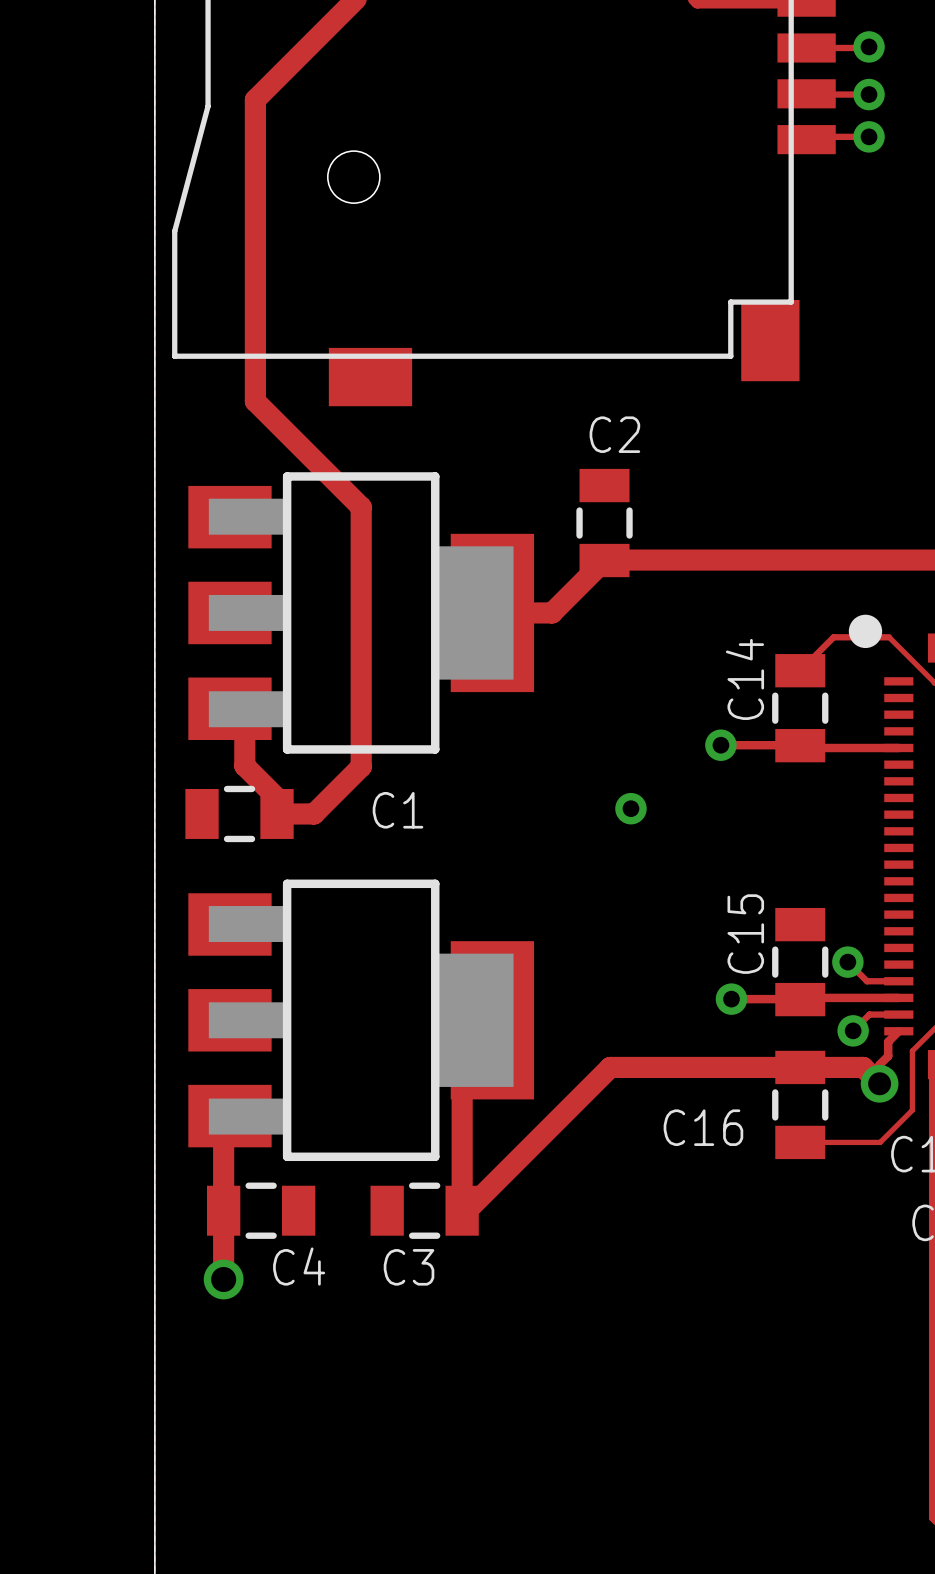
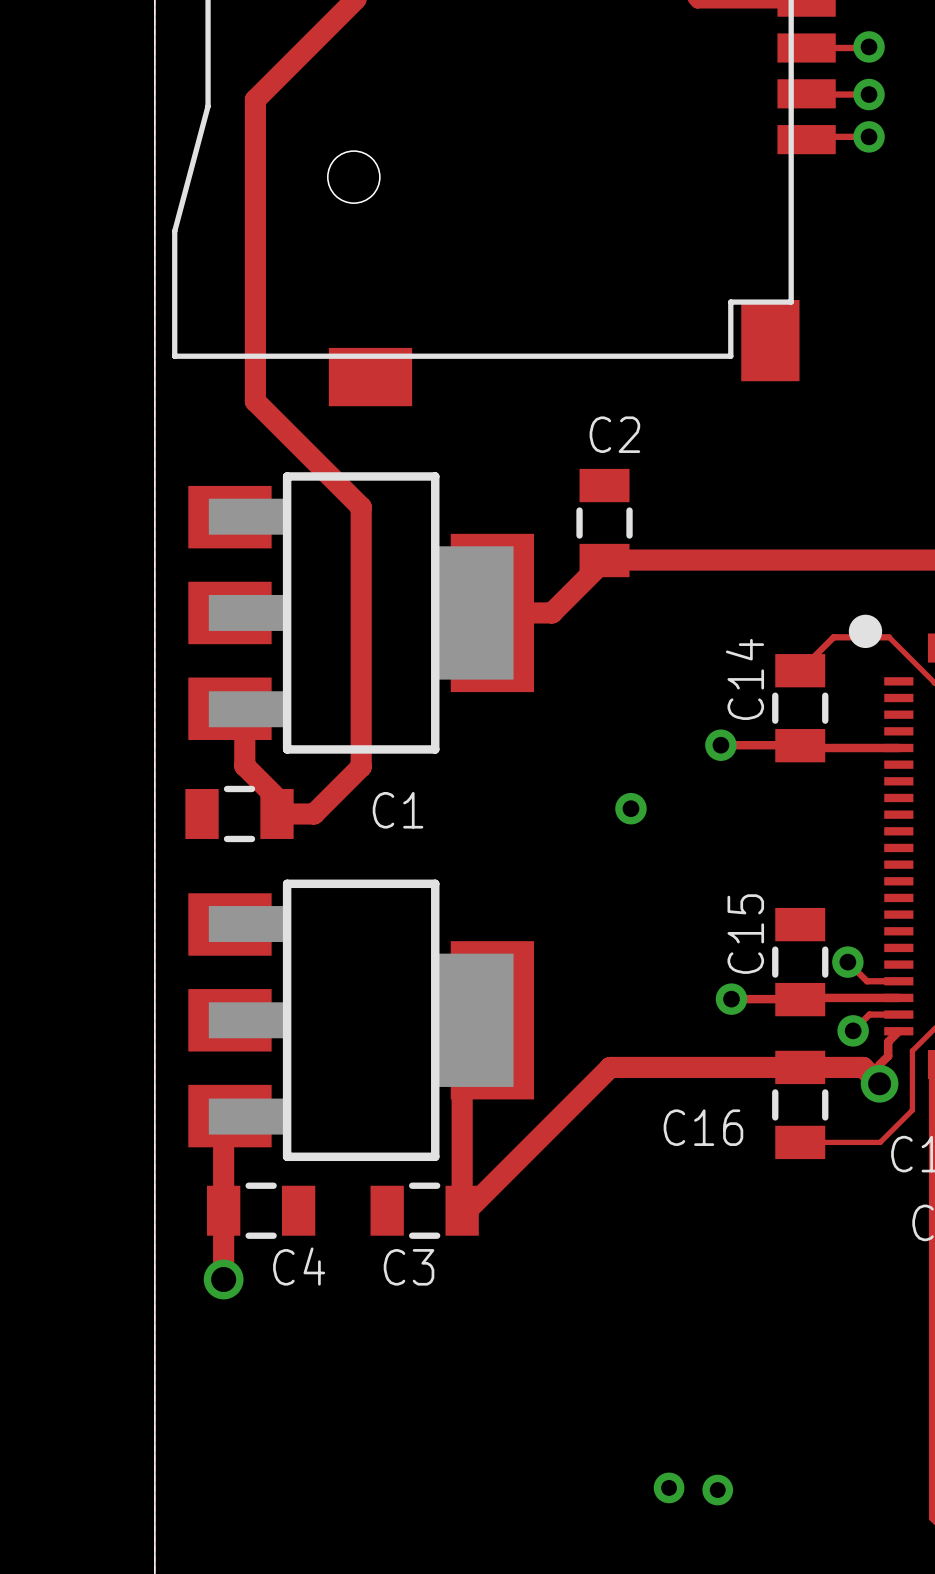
via: none -> (669, 1487)
via: none -> (717, 1490)

